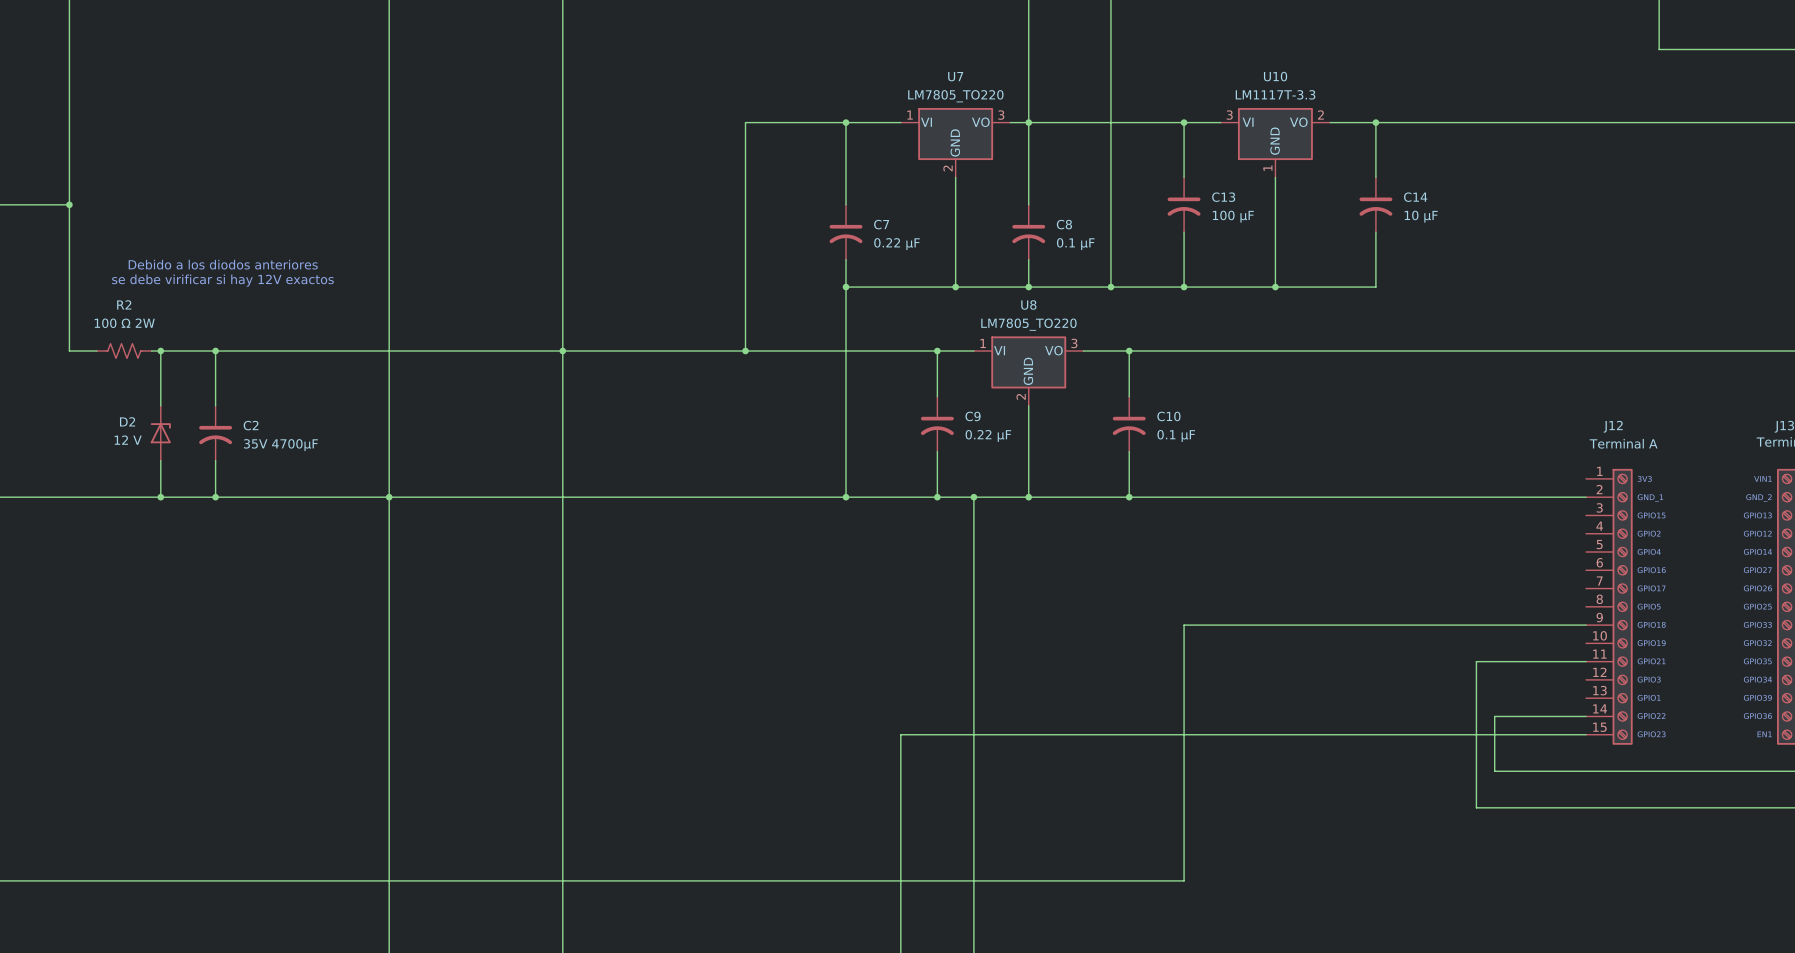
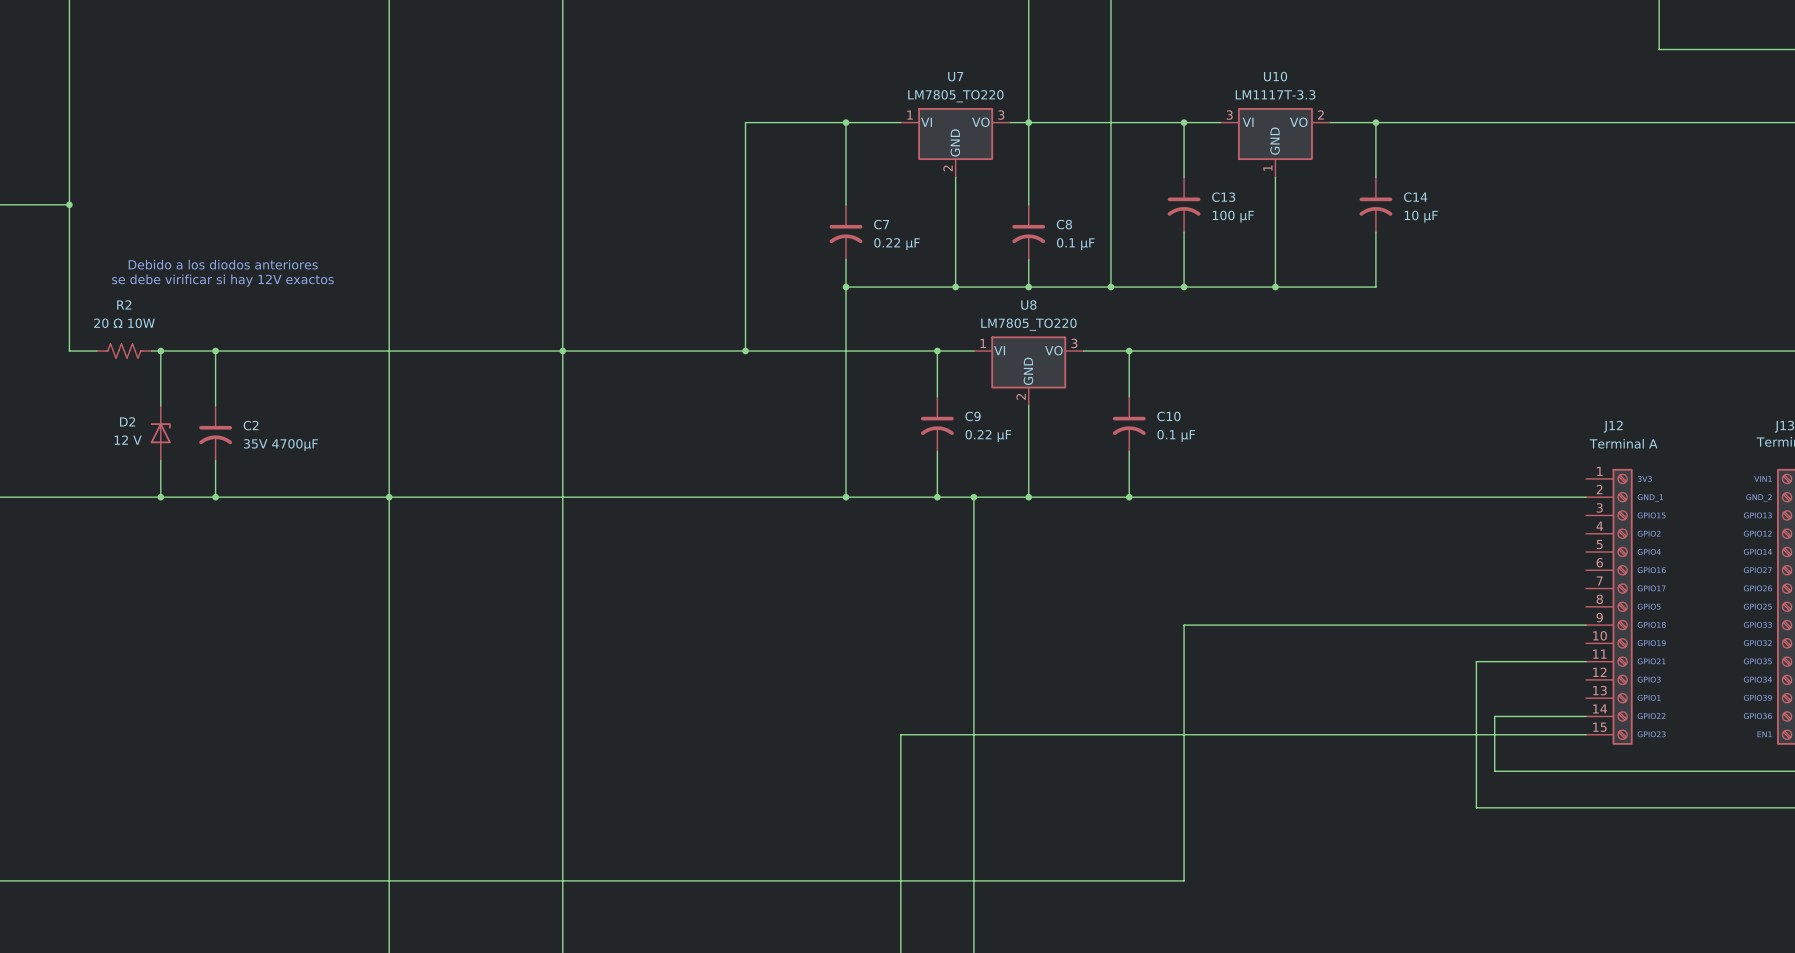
R2 value: 100 Ω 2W (124, 323) -> 20 Ω 10W (124, 323)

